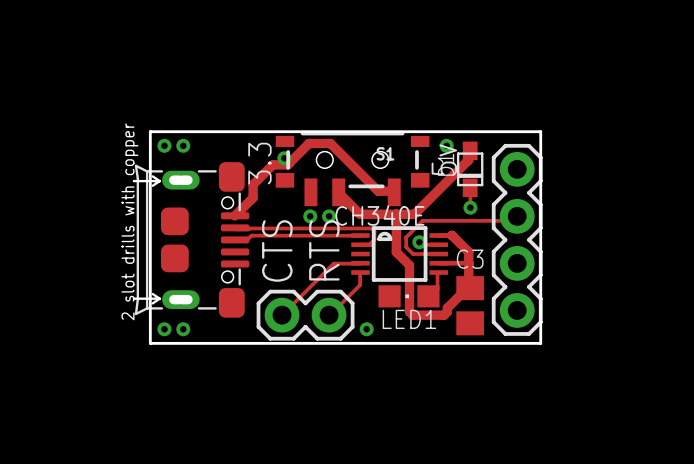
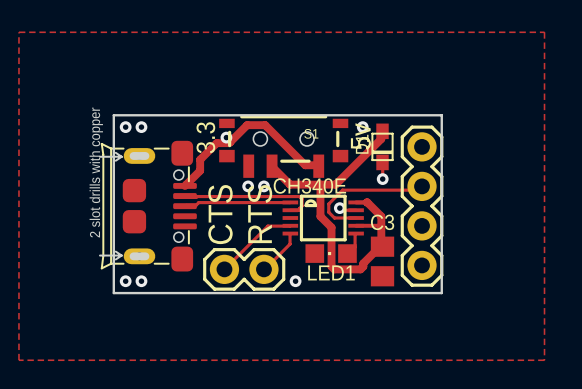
zone outline: none -> (18, 32) (18, 360) (544, 360) (544, 32) (18, 32)

